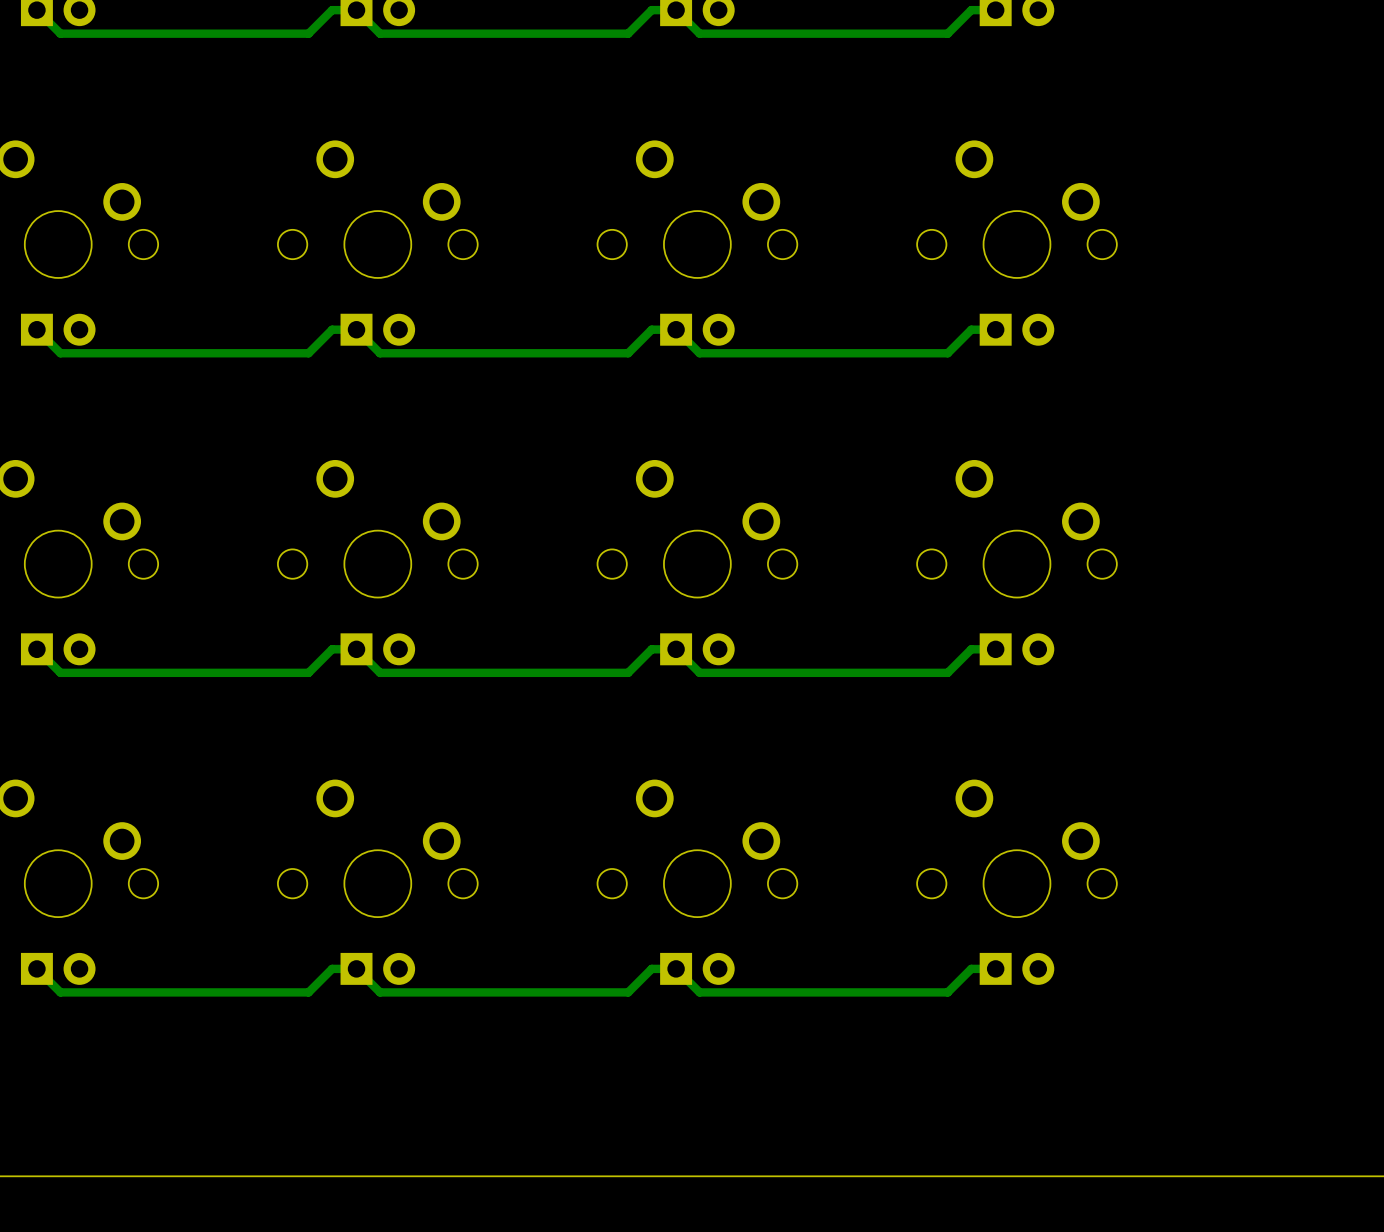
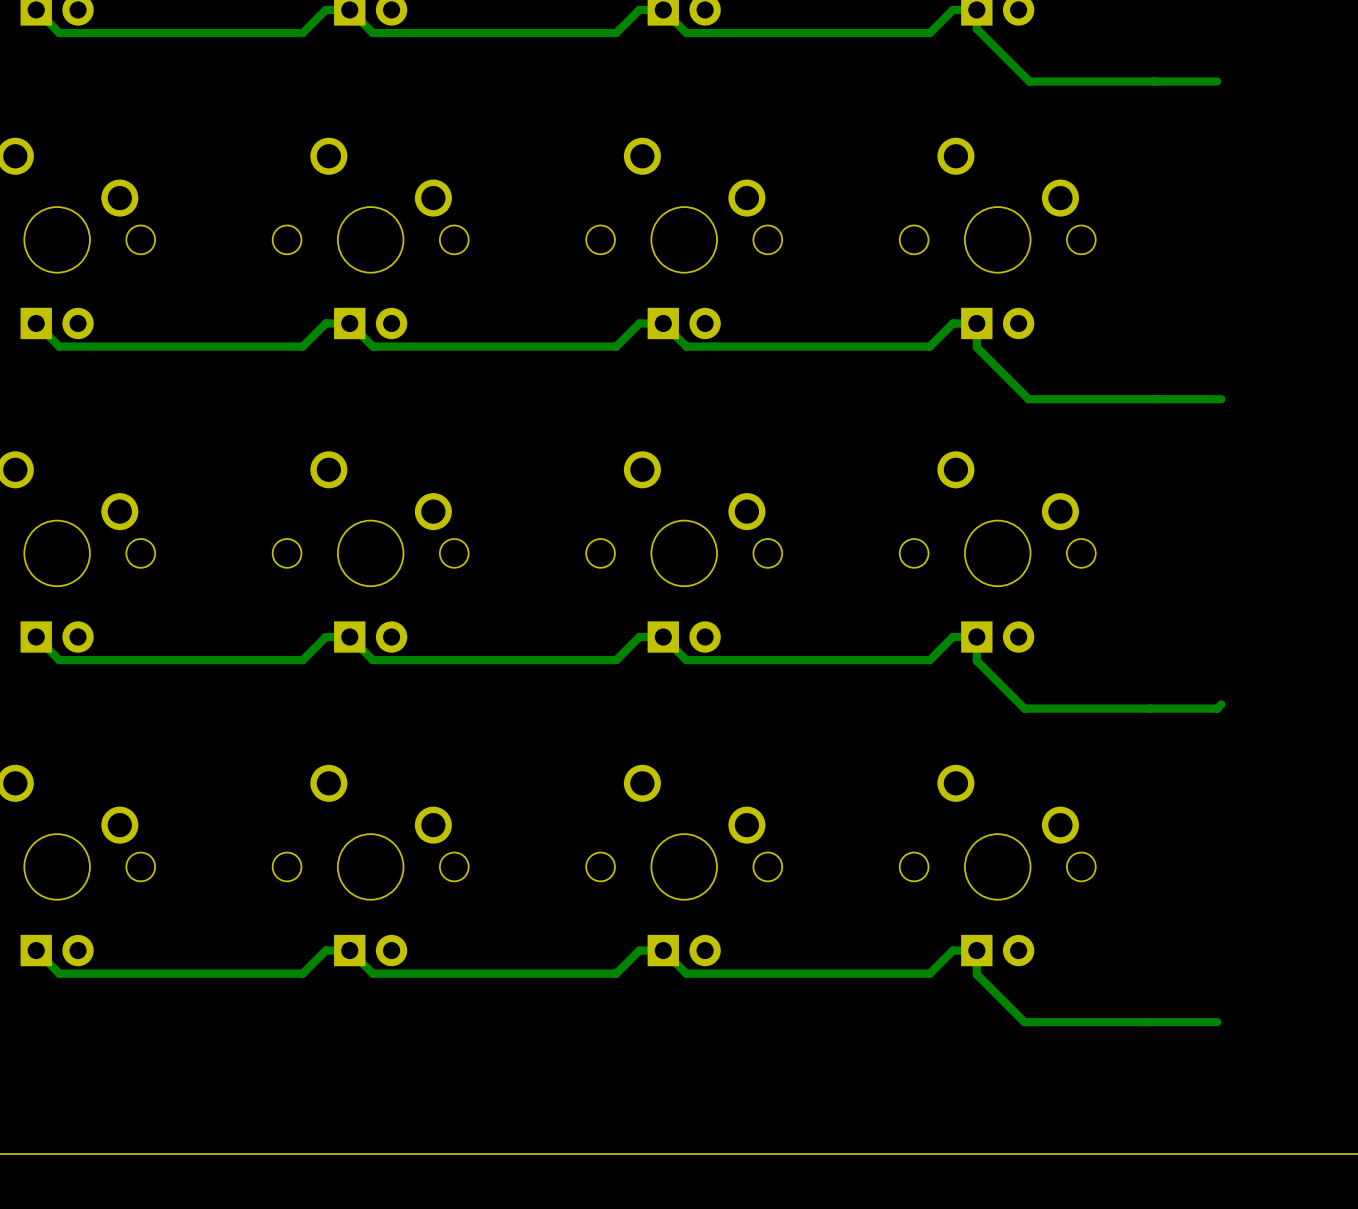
track: none -> (976, 9) (976, 28) (1029, 81) (1217, 81)
track: none -> (976, 323) (976, 347) (1028, 399) (1221, 399)
track: none -> (976, 637) (976, 660) (1024, 708) (1217, 708) (1221, 704)
track: none -> (976, 950) (976, 974) (1024, 1022) (1217, 1022)

